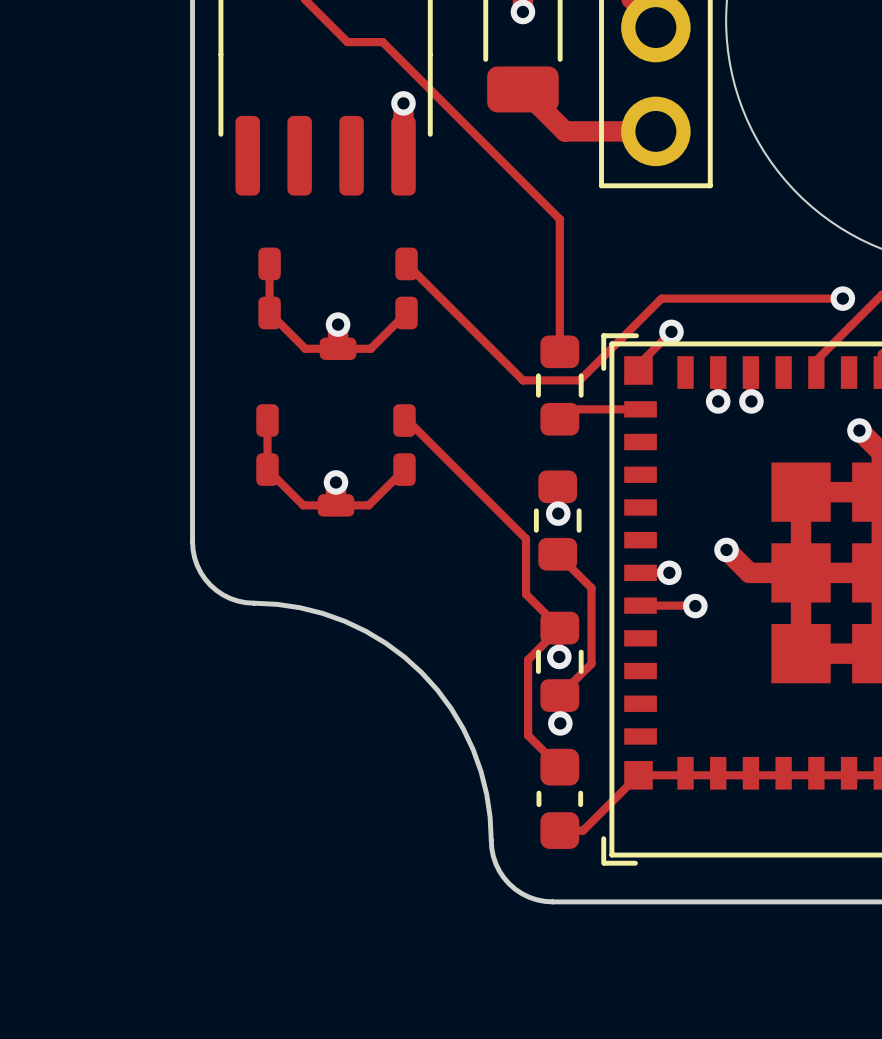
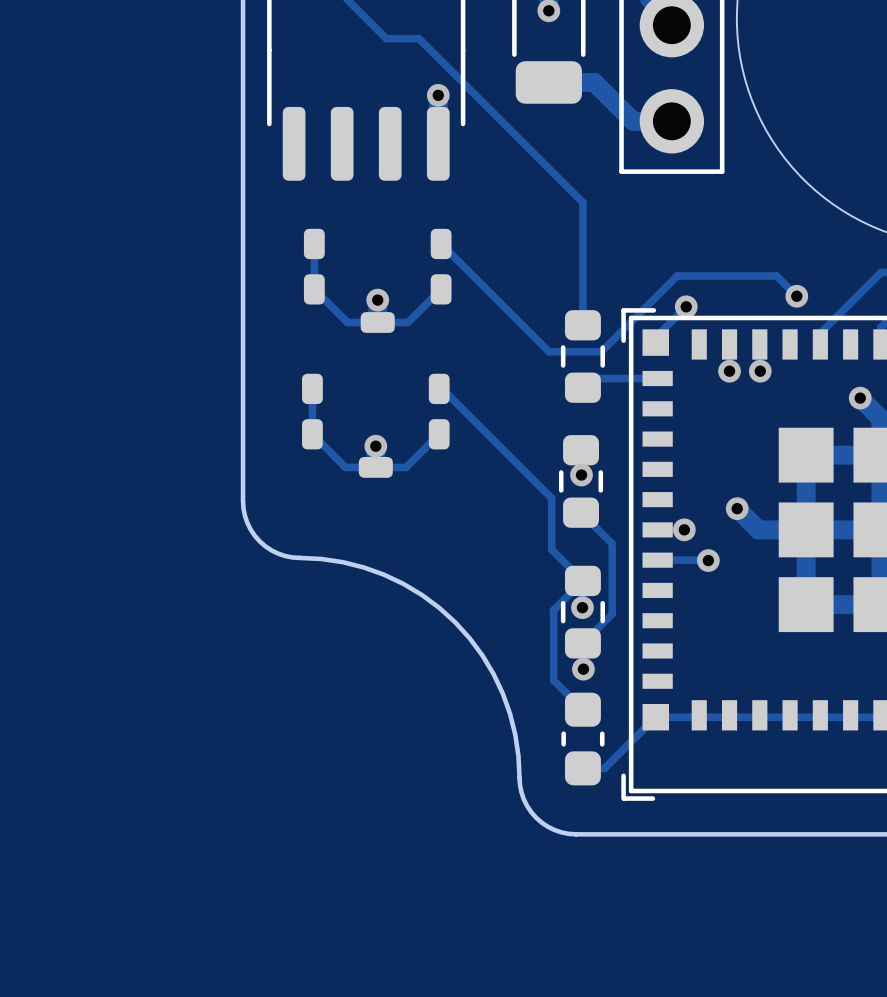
track: (522, 89) (564, 131) (614, 131) -> (548, 82) (594, 82) (633, 121)
track: (769, 298) (842, 298) -> (776, 276) (796, 296)
via position: (842, 298) -> (796, 296)

